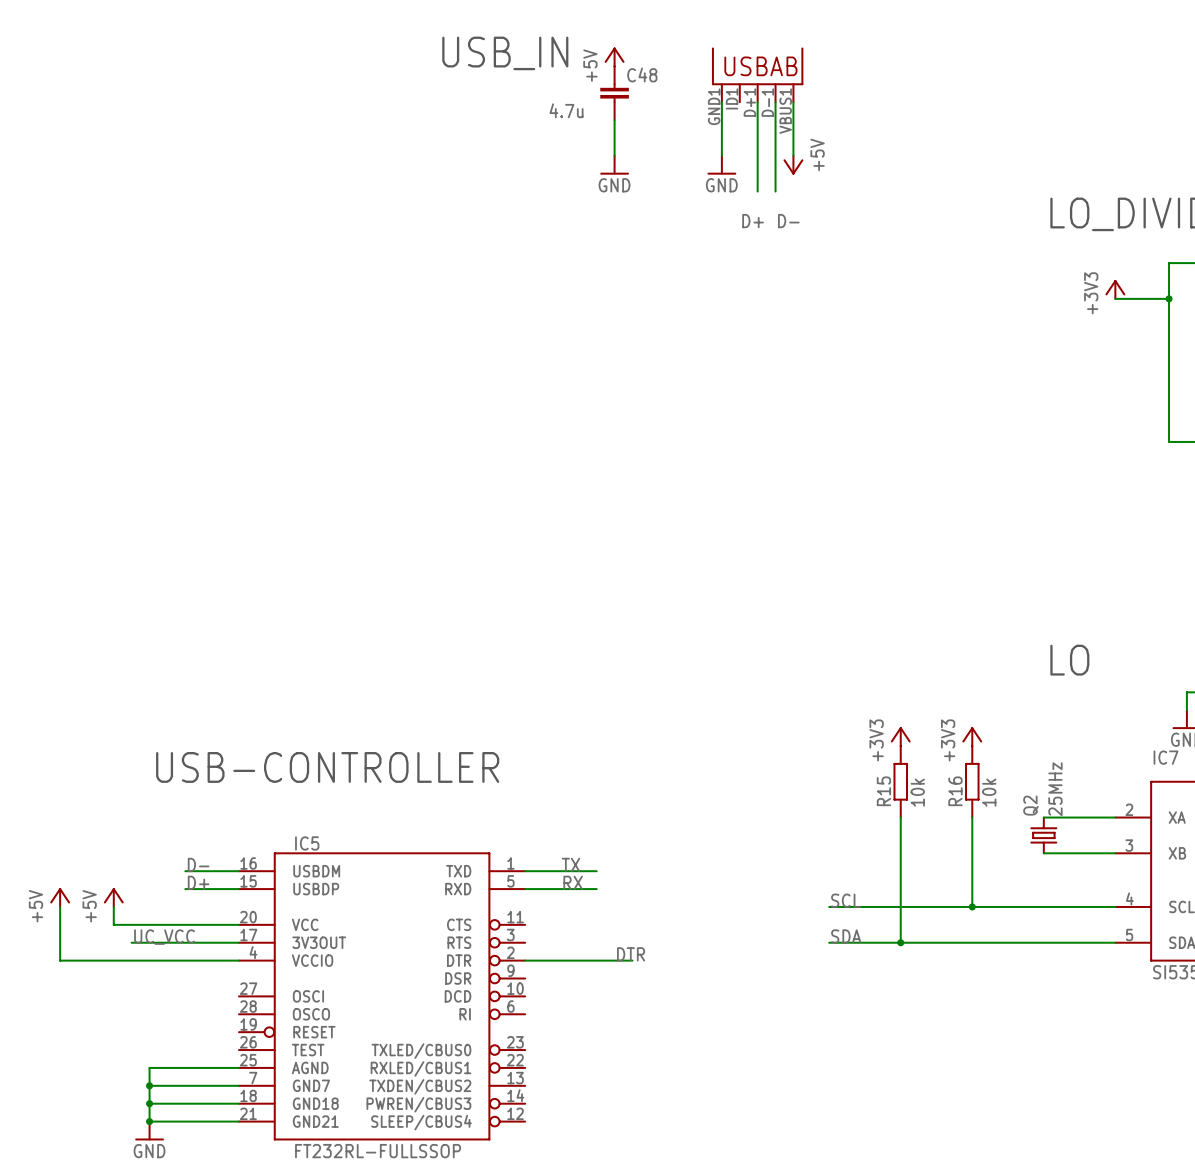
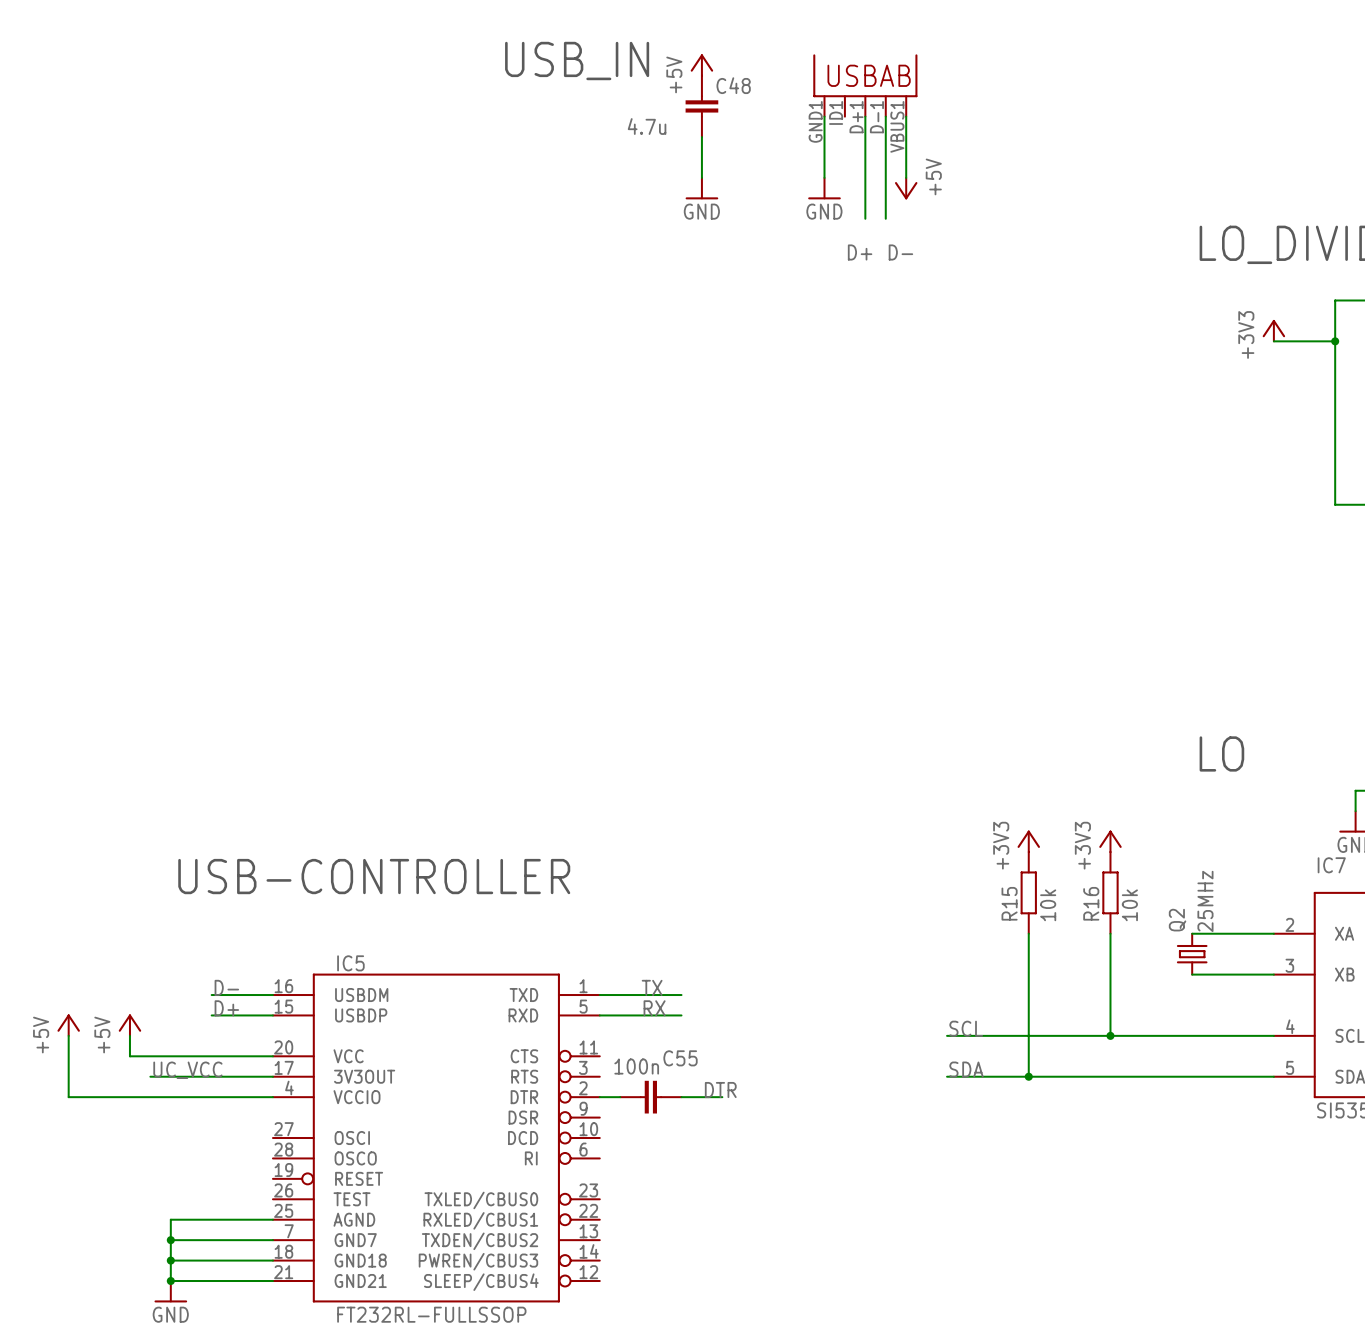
C55: none -> 100n (650, 1097)

